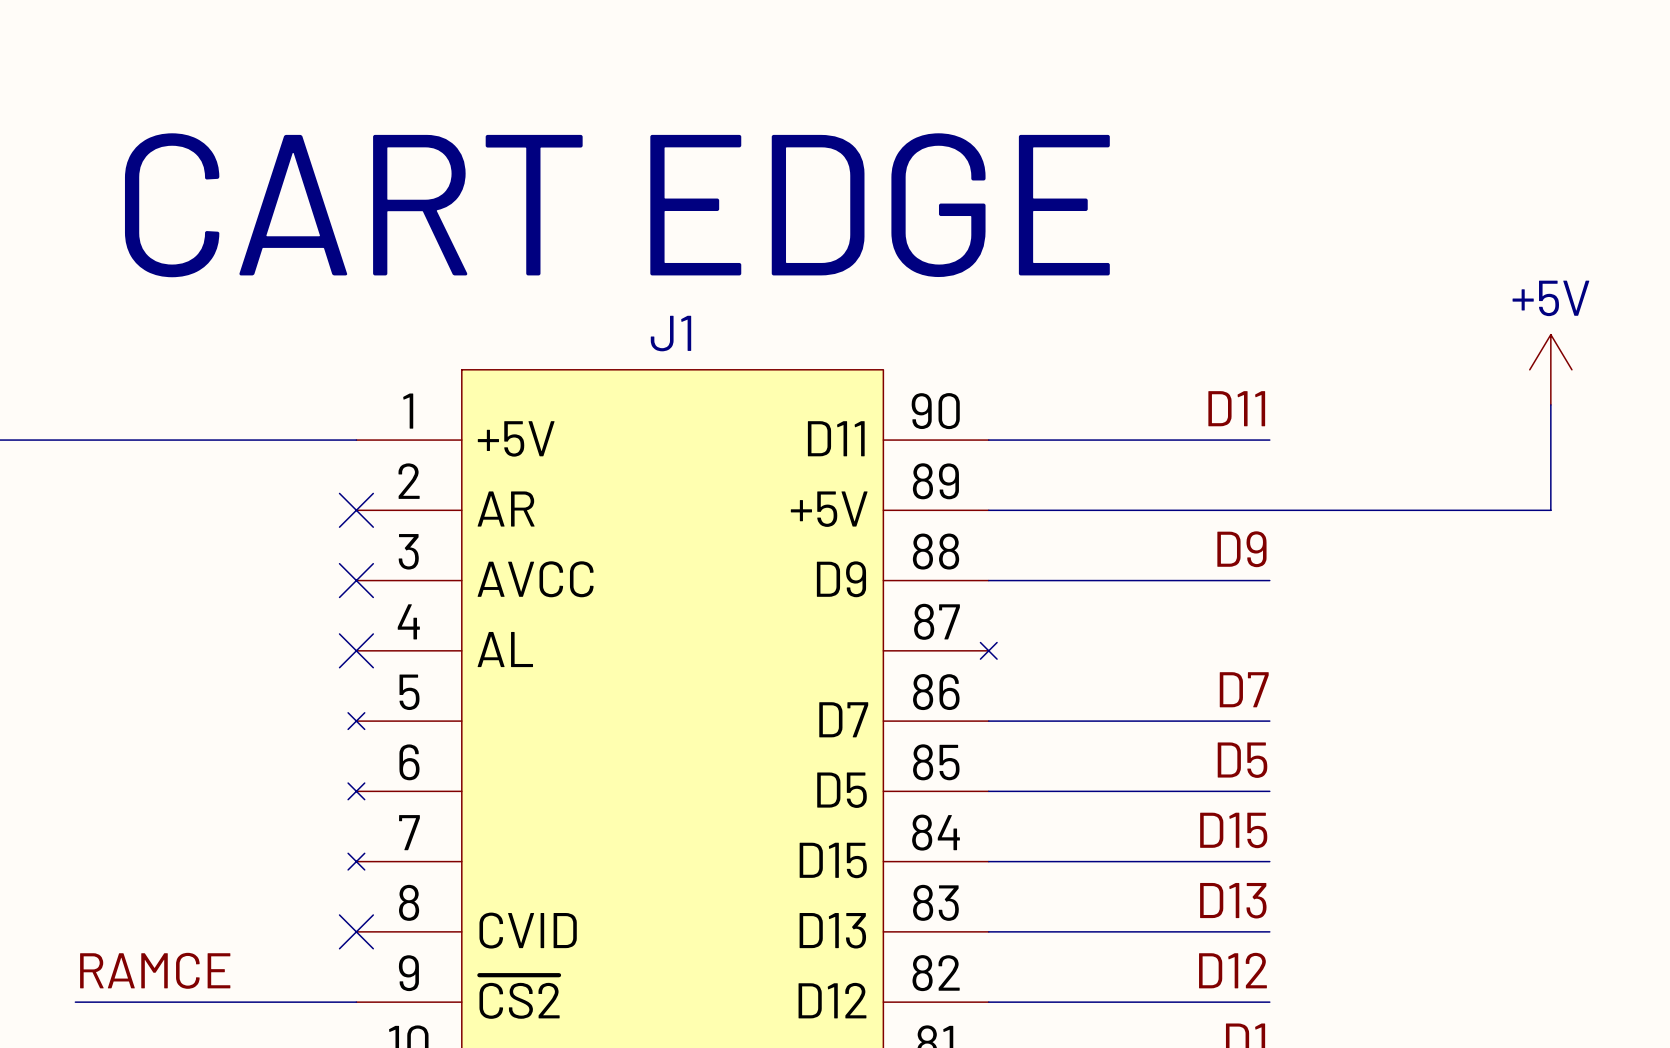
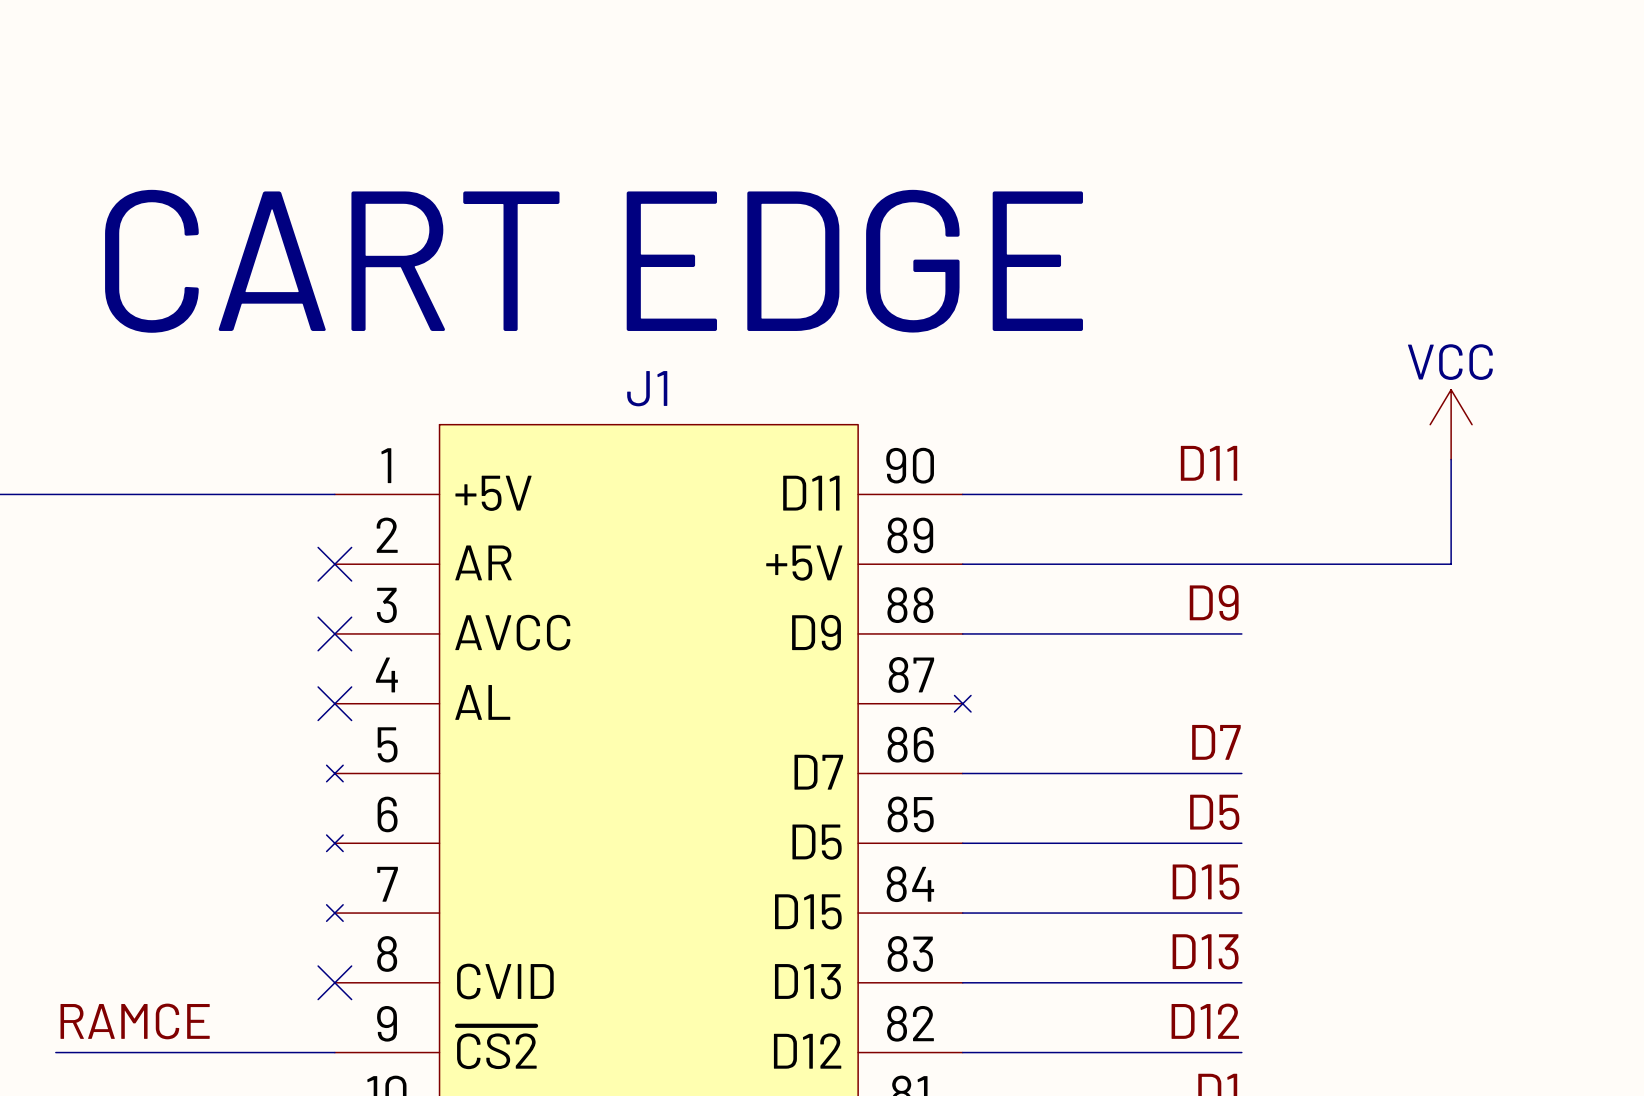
power symbol: none -> VCC (1451, 424)
power symbol: +5V (1550, 369) -> none
wire: (1550, 404) (1550, 510) (1480, 510) -> (1451, 459) (1451, 564)

